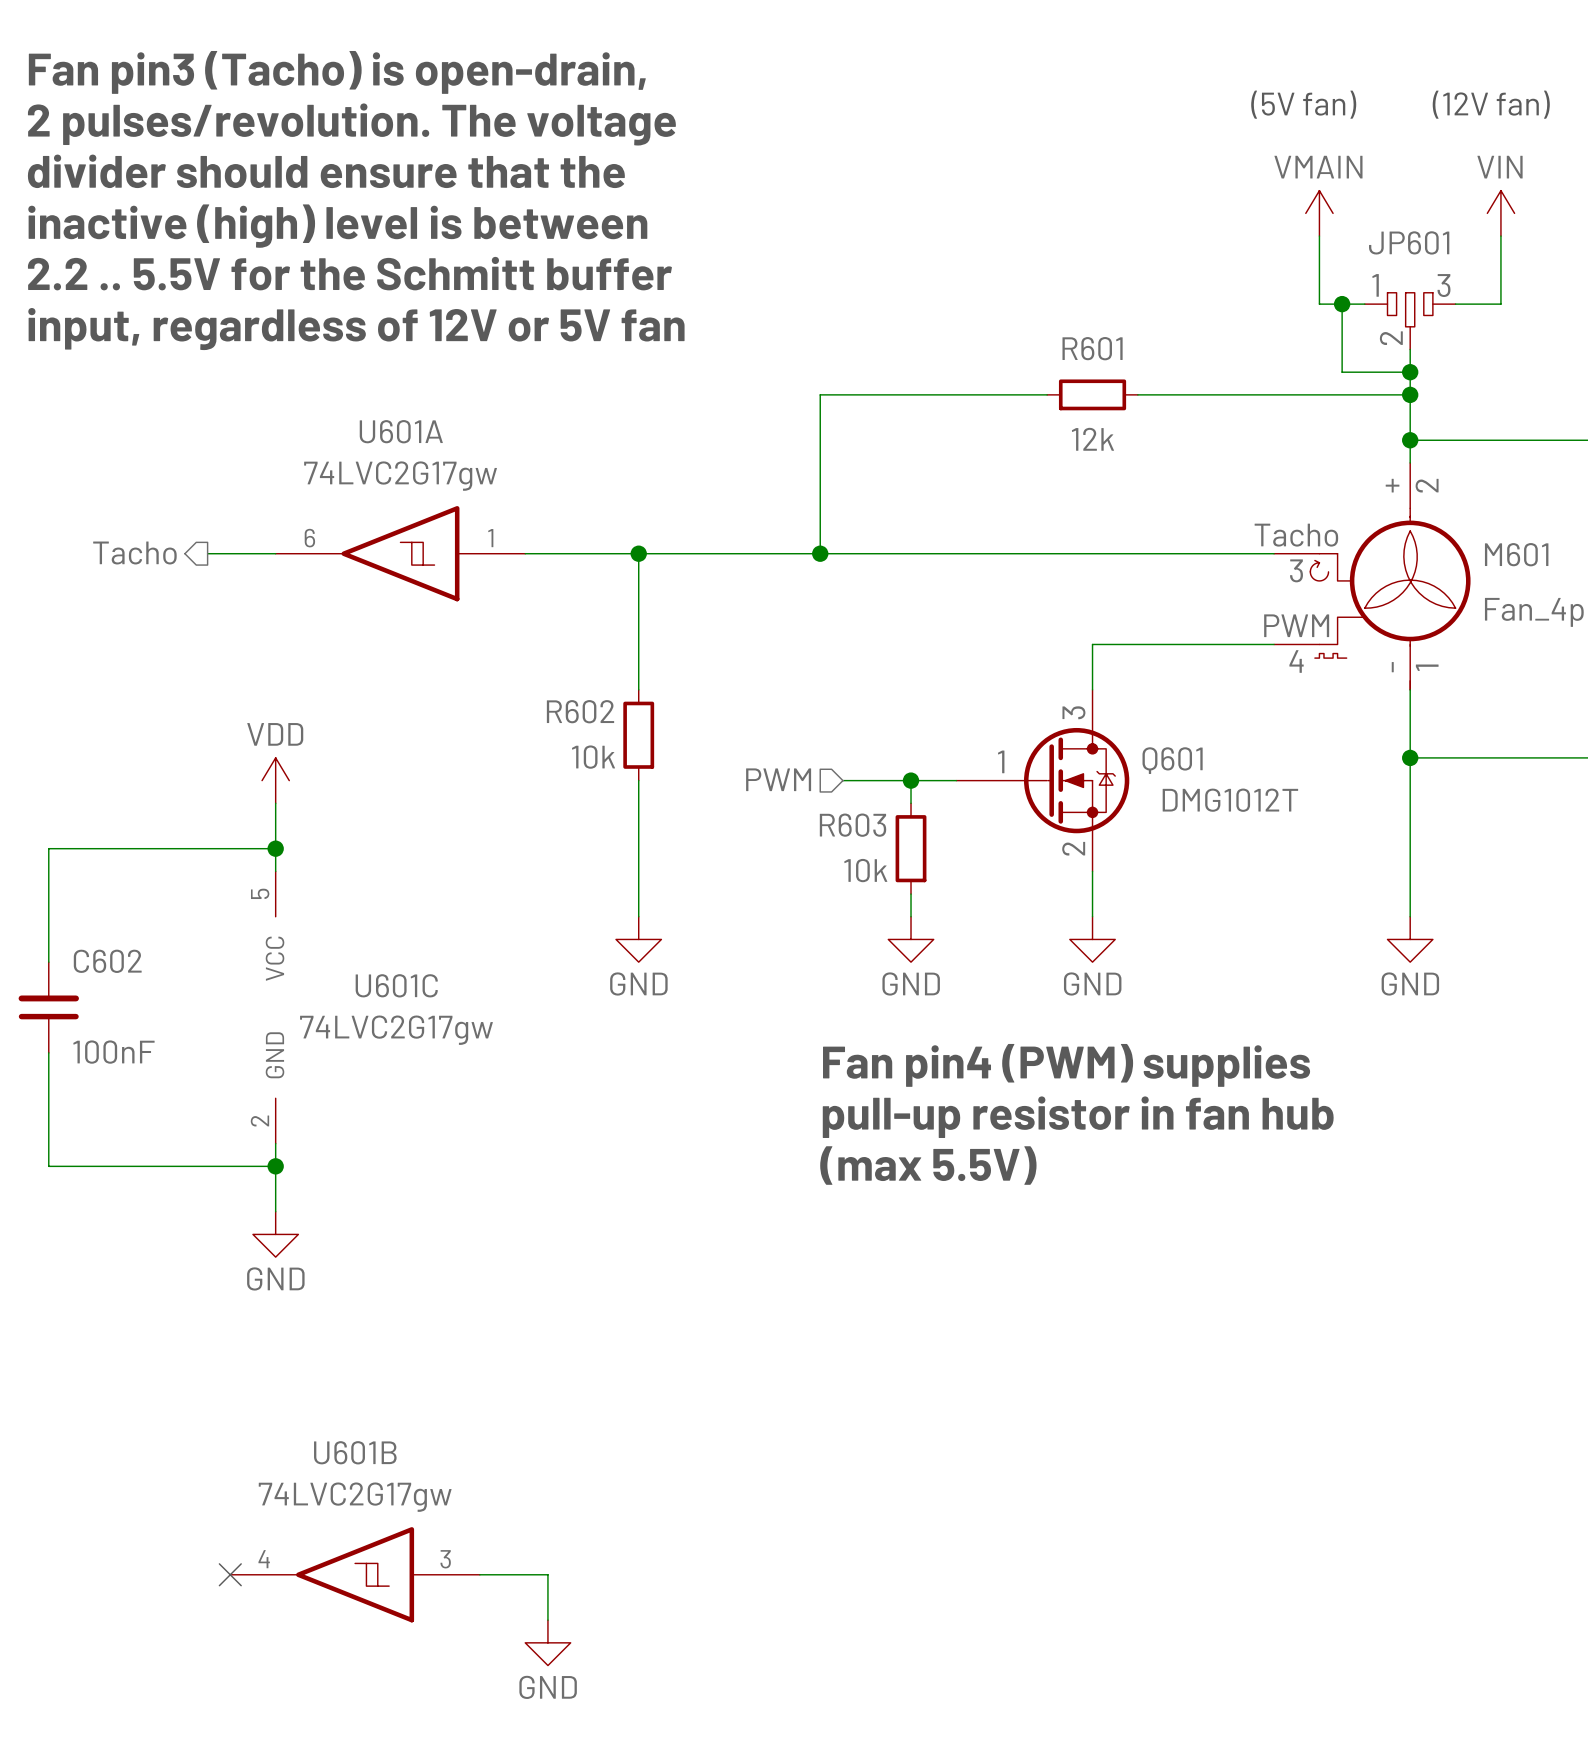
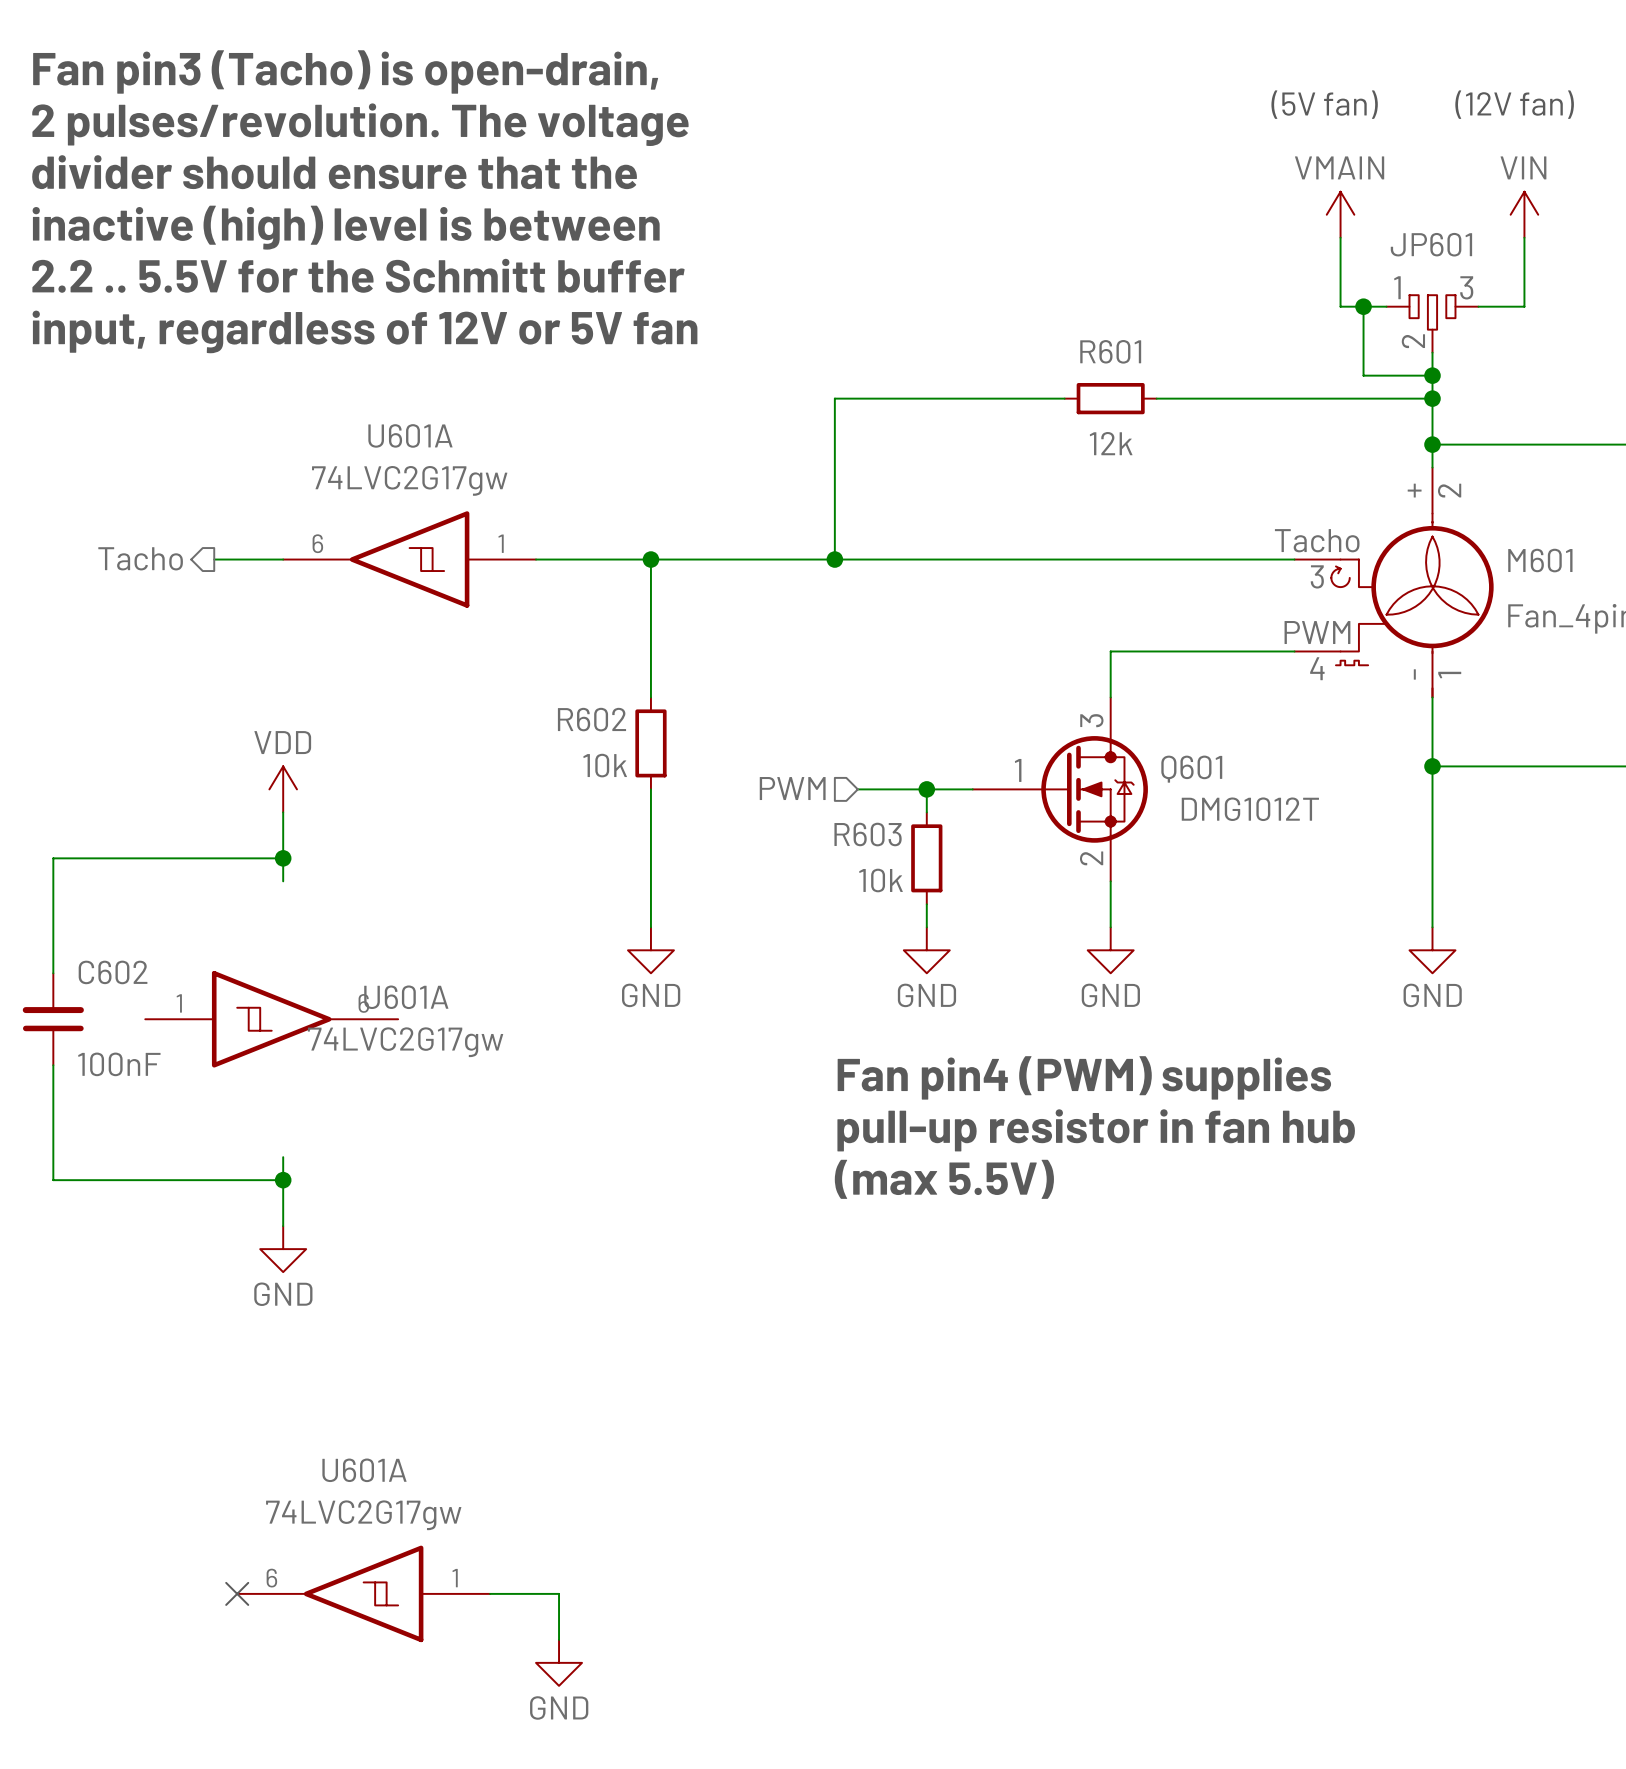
U601A: none -> 74LVC2G17gw (271, 1019)
U601C: 74LVC2G17gw (275, 1007) -> none
U601B name: U601B (355, 1452) -> U601A (364, 1470)
U601B pin number: 4 (264, 1559) -> 6 (271, 1578)
U601B pin number: 3 (445, 1559) -> 1 (455, 1578)

